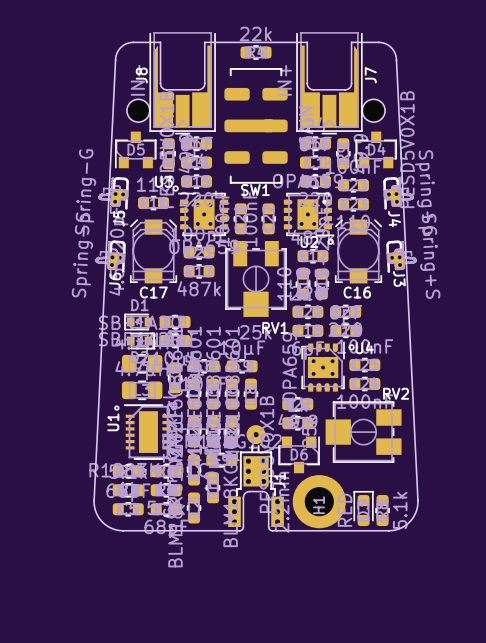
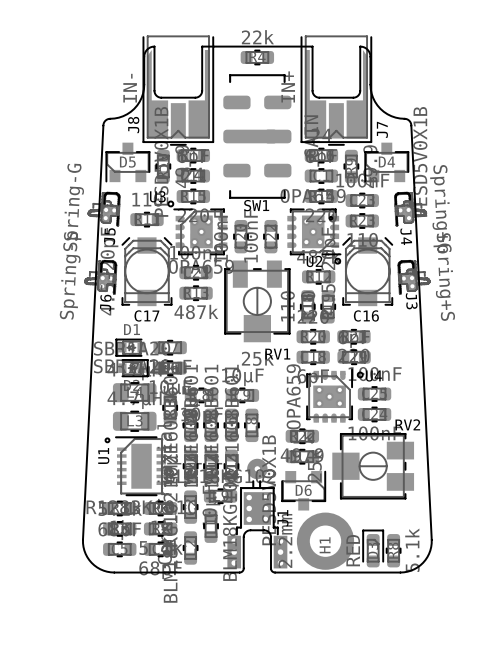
board edge: (160, 42) (126, 43) (119, 49) (115, 57) (94, 500) -> (154, 46) (148, 48) (144, 54) (143, 89) (139, 101) (127, 114) (107, 119) (103, 124) (82, 539)
board edge: (351, 42) (385, 43) (392, 49) (396, 57) (417, 500) -> (360, 46) (366, 48) (370, 54) (370, 89) (375, 101) (387, 114) (407, 119) (411, 124) (431, 539)
J8 name position: J8 (141, 75) -> J8 (133, 125)
J7 name position: J7 (370, 75) -> J7 (382, 129)
part: (138, 110) -> none
part: (373, 110) -> none

